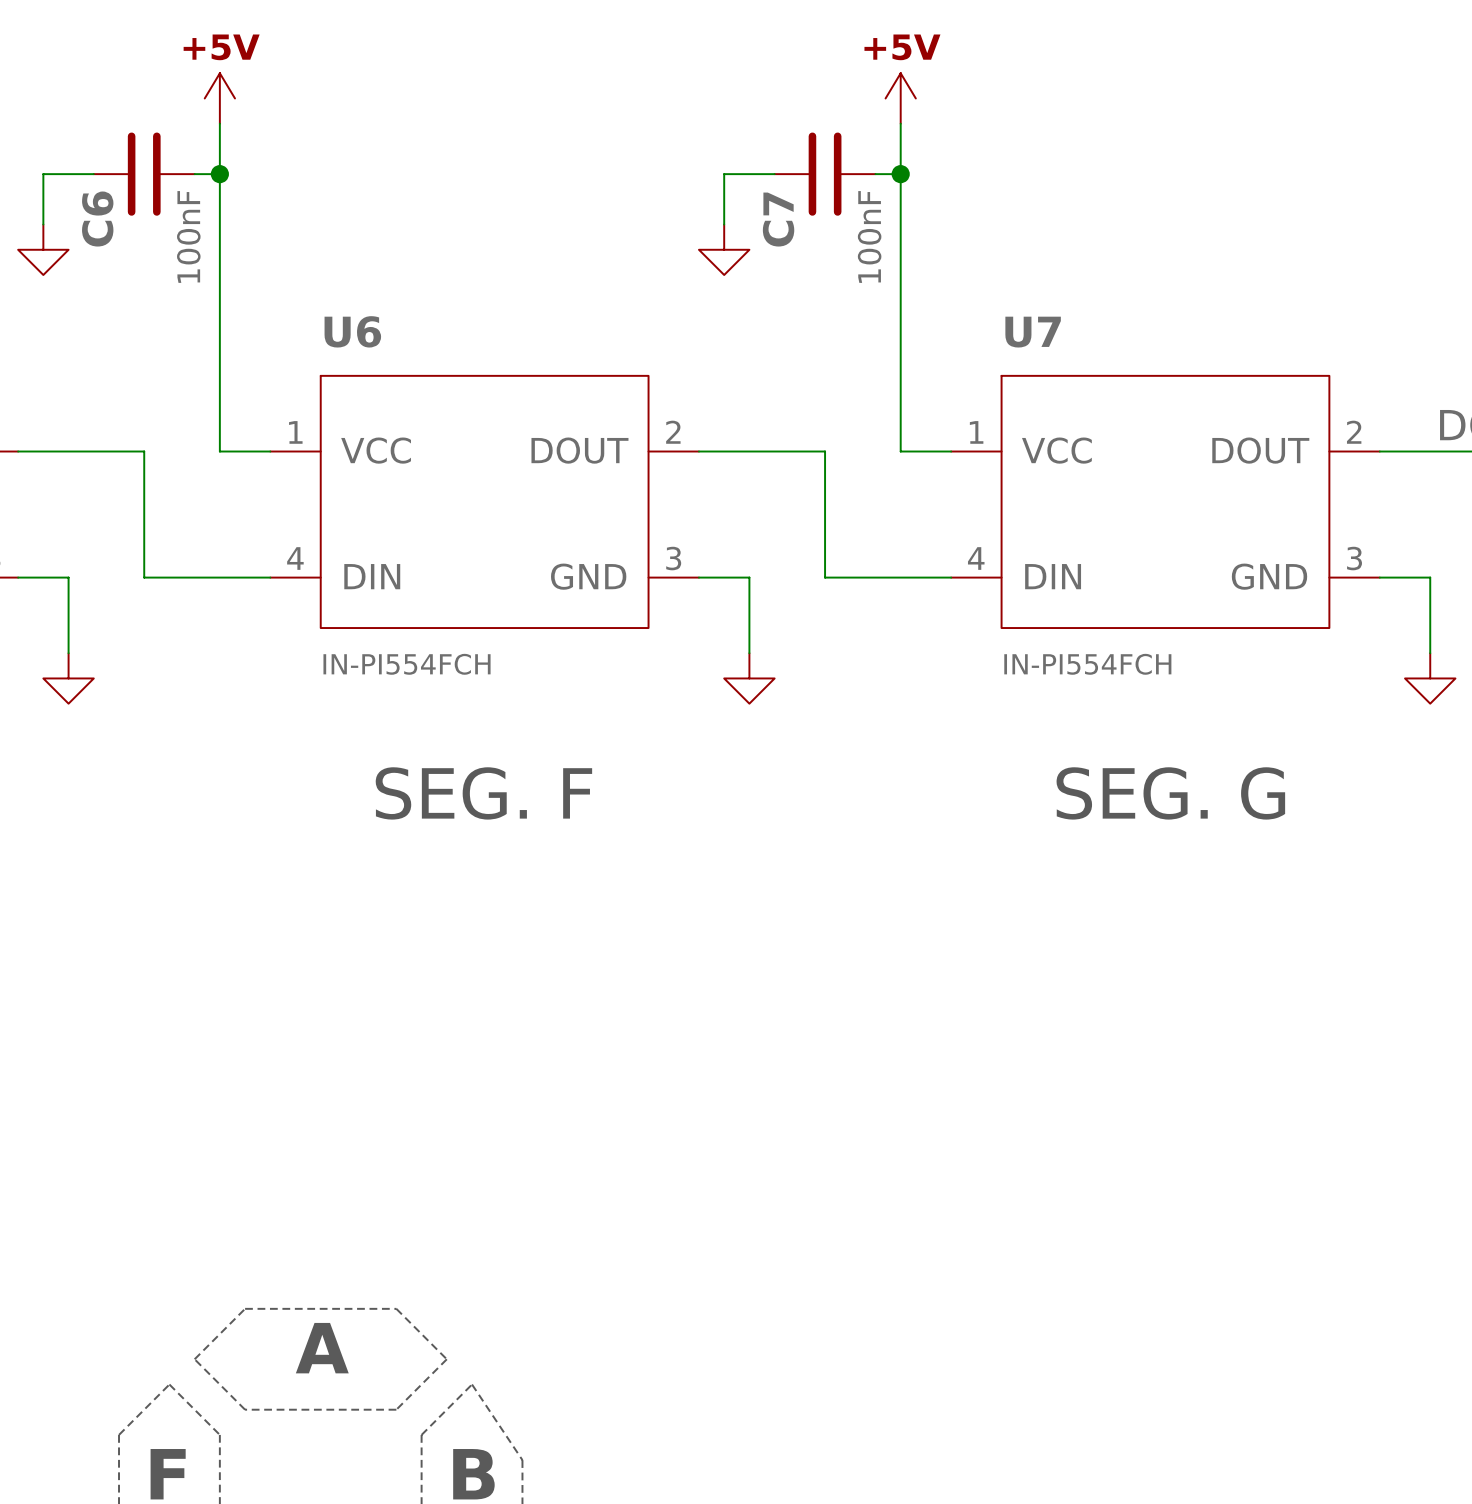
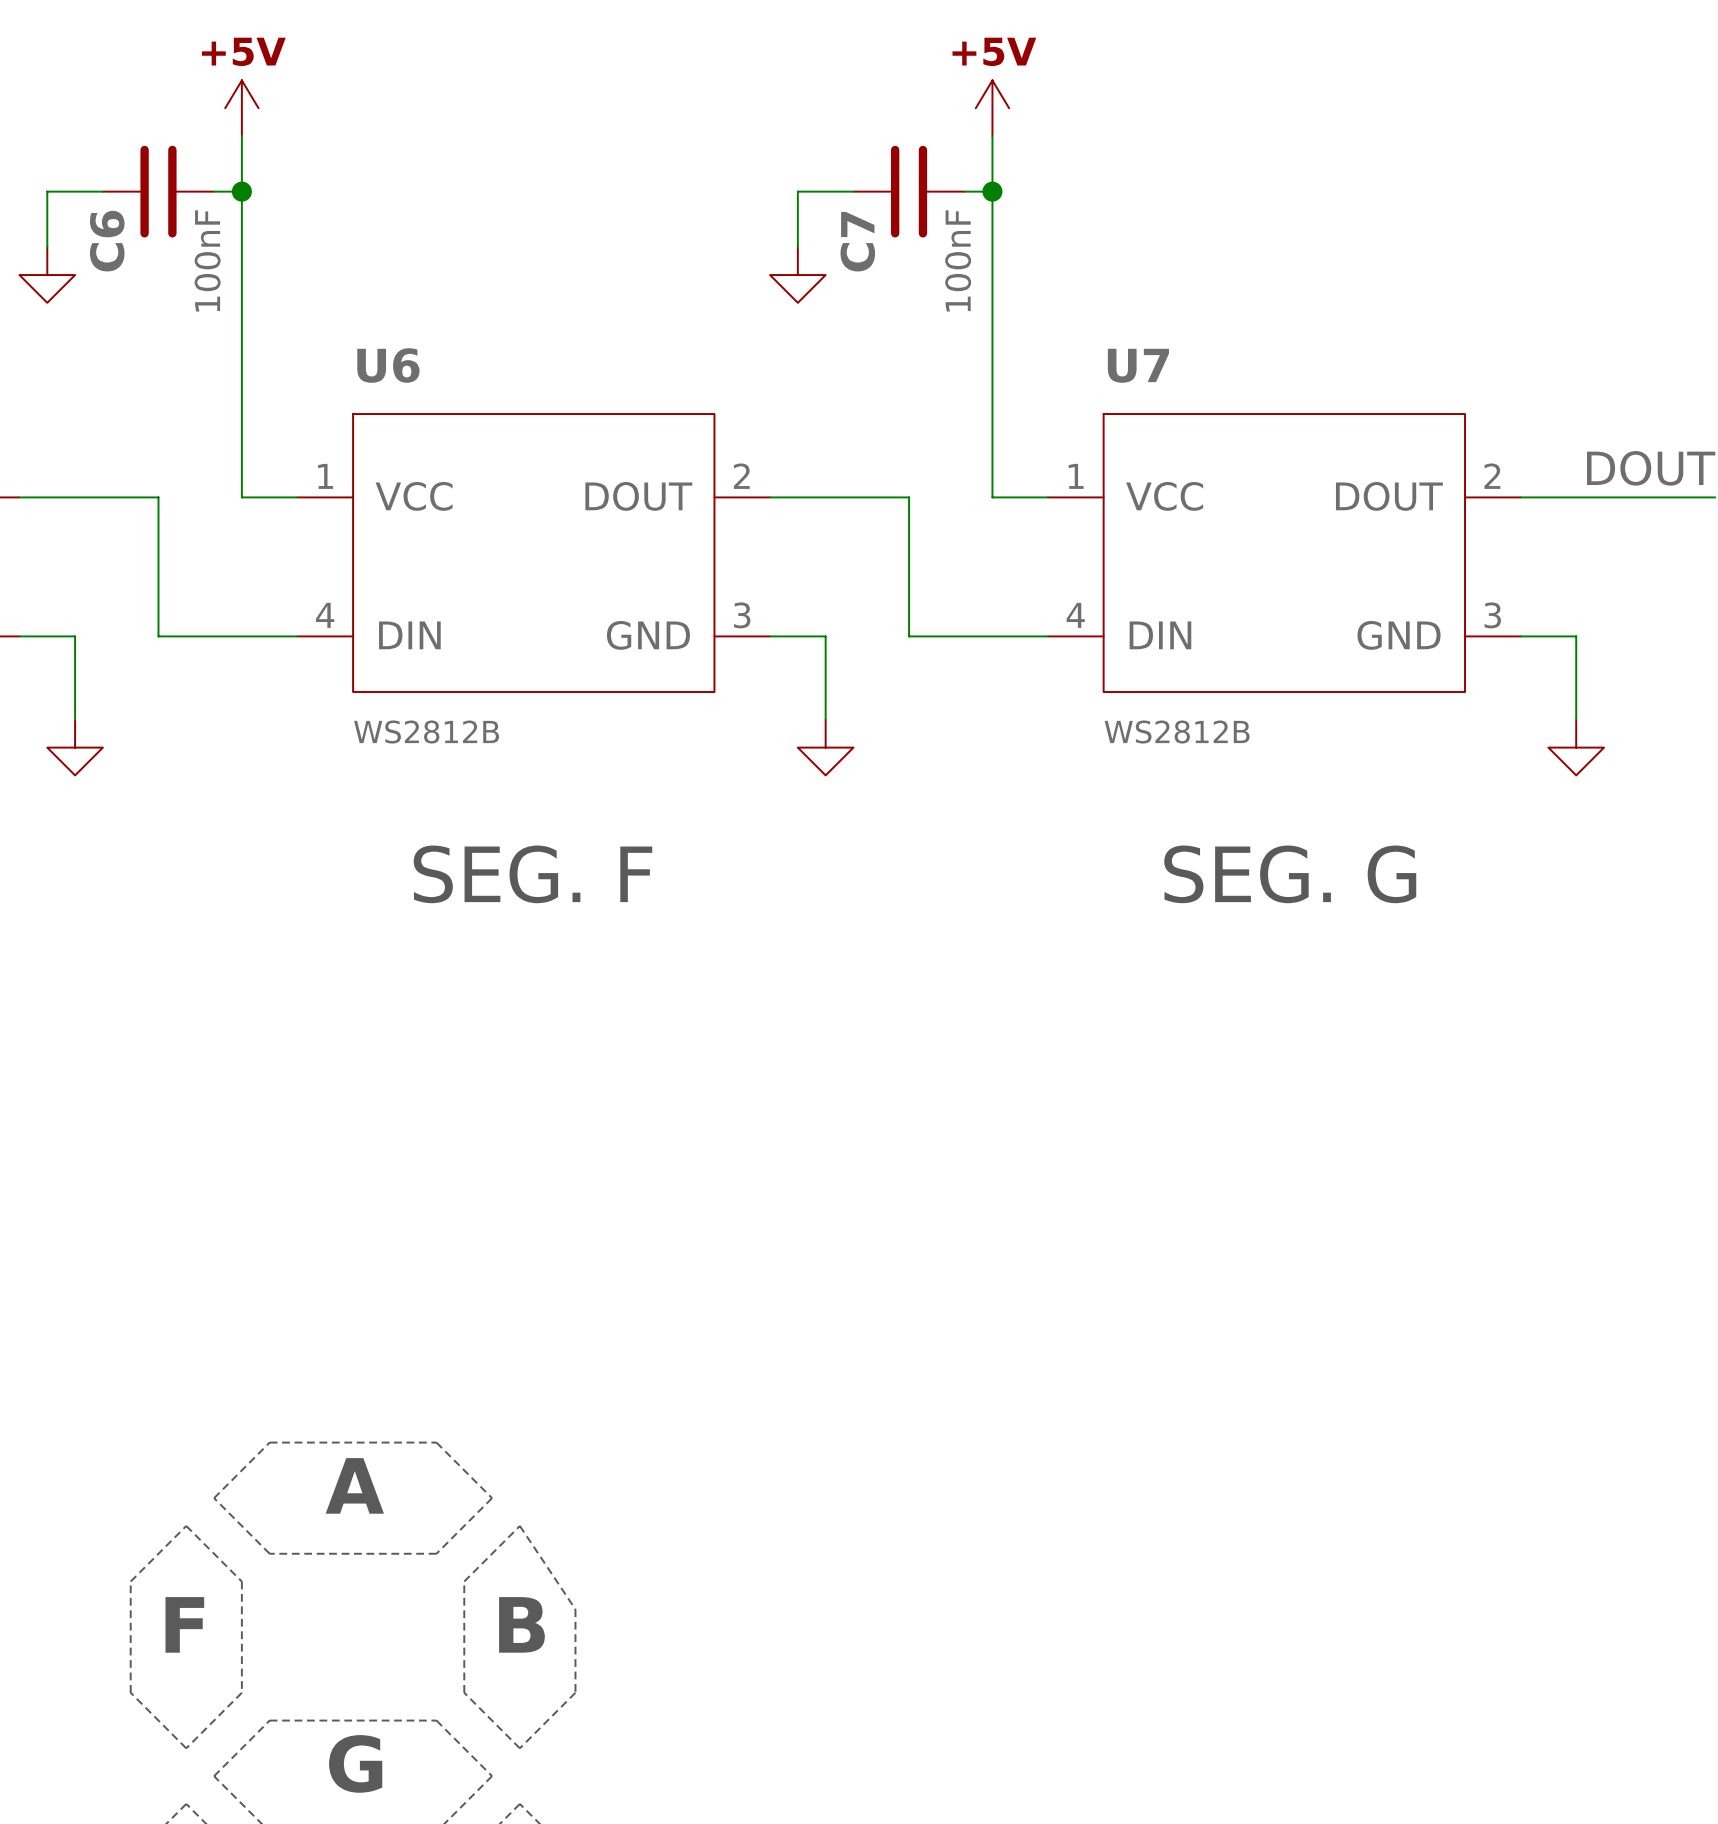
U6 value: IN-PI554FCH (407, 664) -> WS2812B (426, 732)
U7 value: IN-PI554FCH (1087, 664) -> WS2812B (1177, 732)

